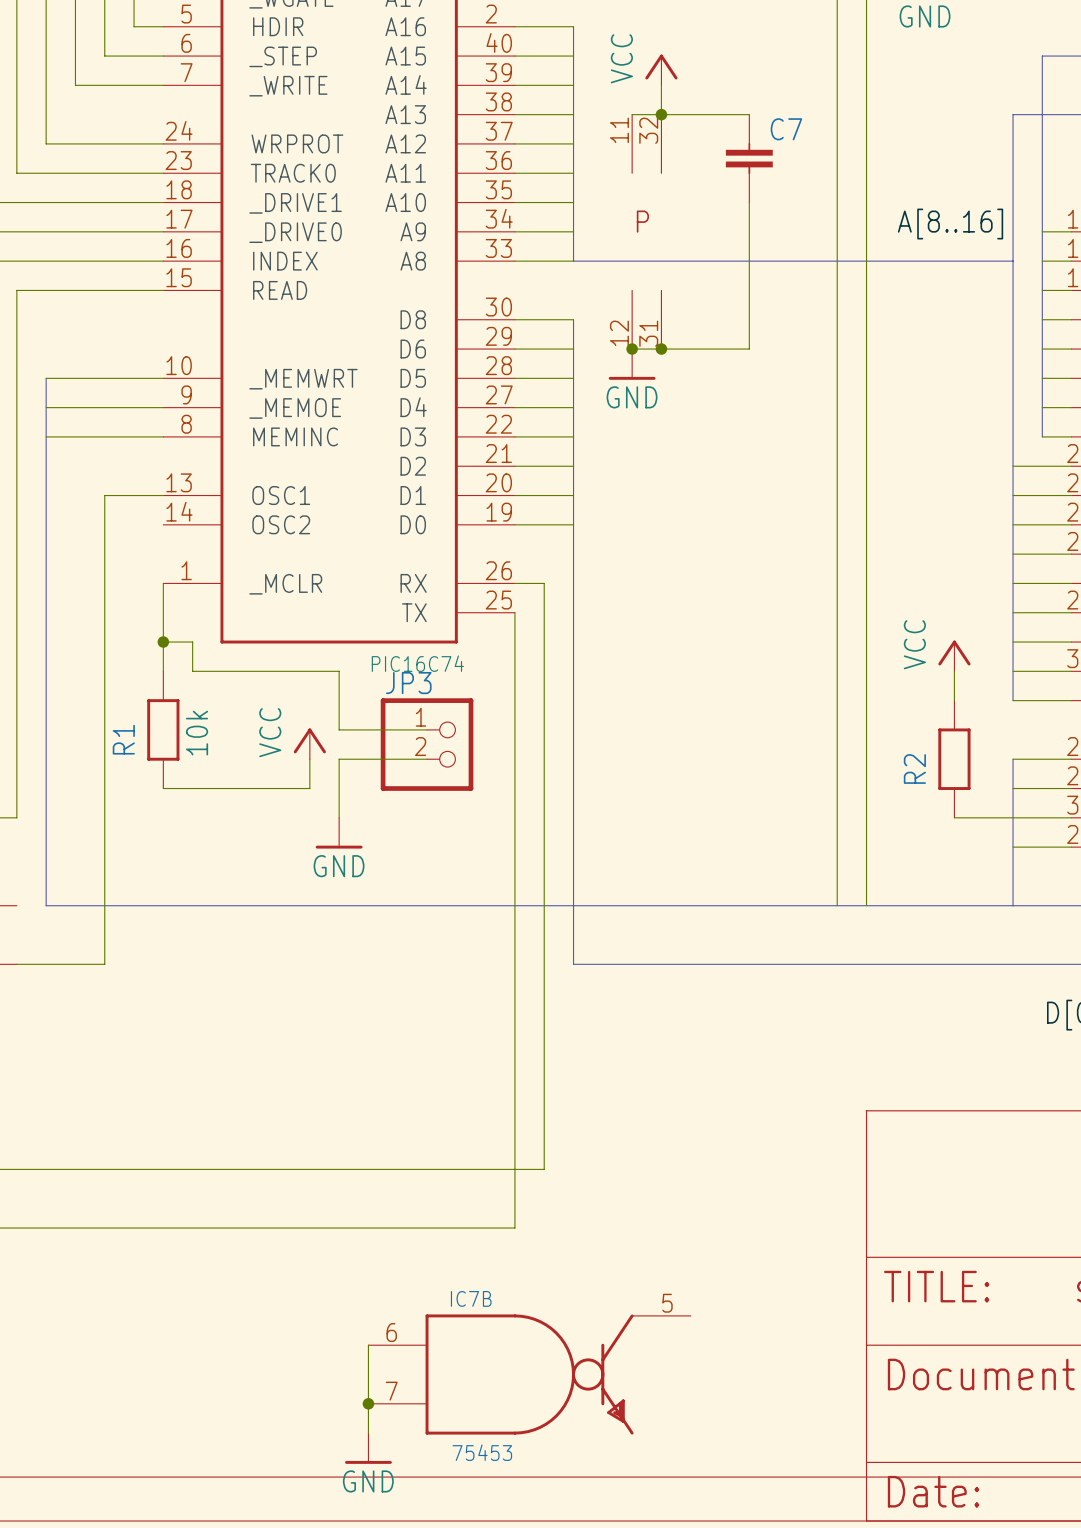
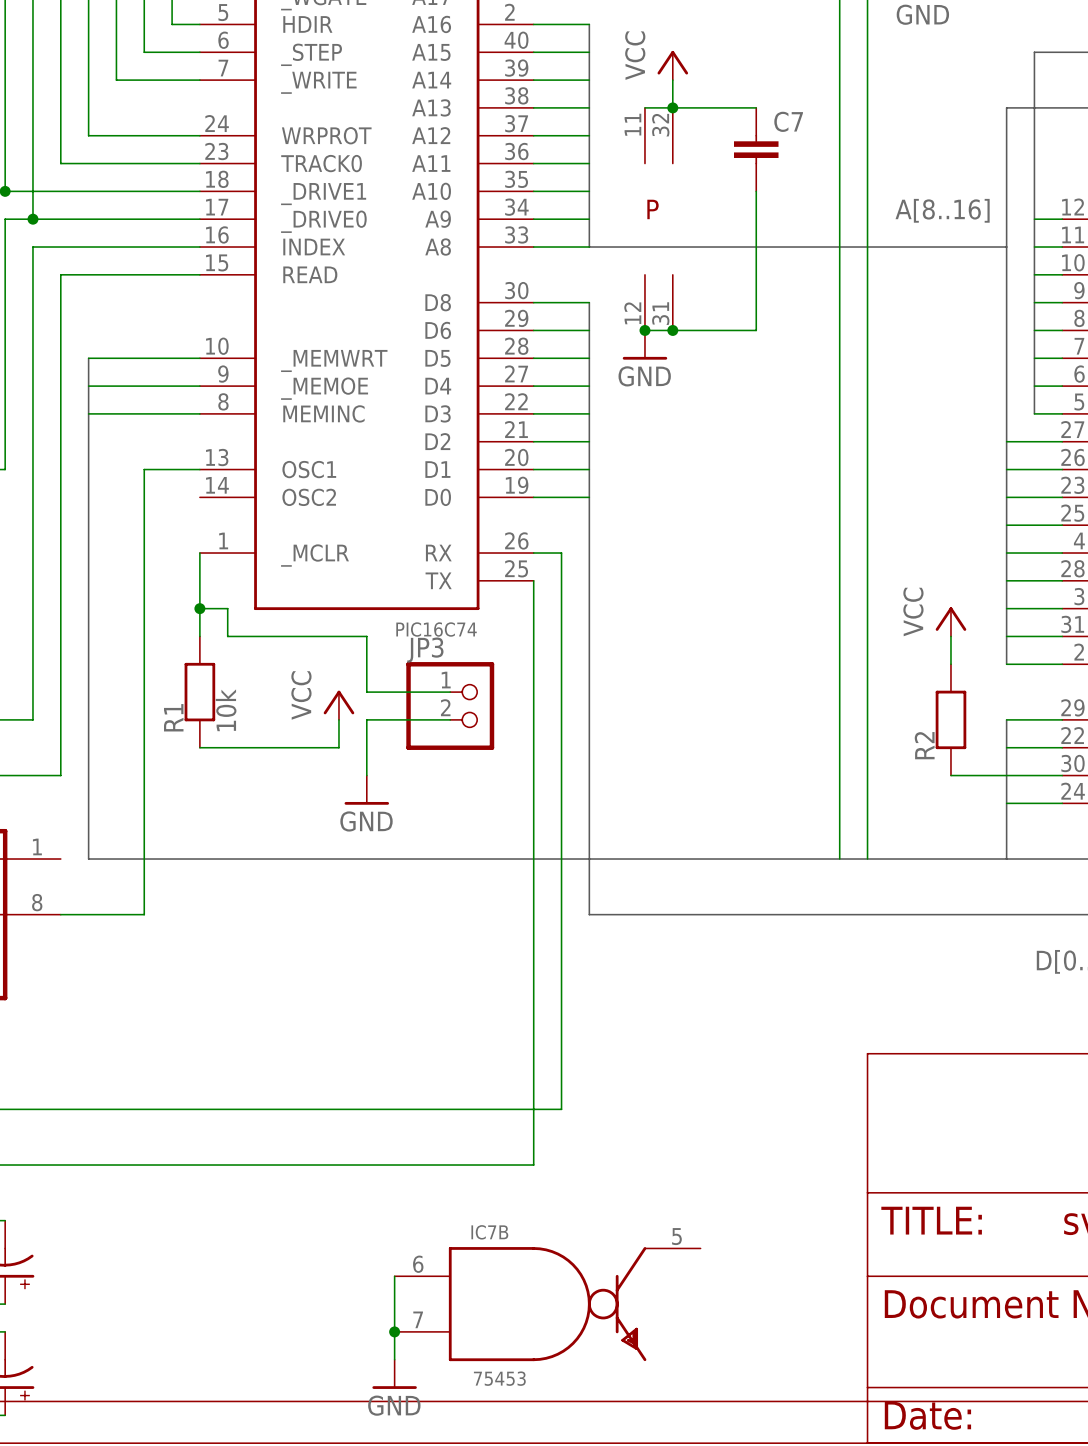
R1 value position: 10k (197, 733) -> 10k (226, 710)
R1 name position: R1 (123, 739) -> R1 (173, 717)
R2 name position: R2 (914, 768) -> R2 (924, 745)

